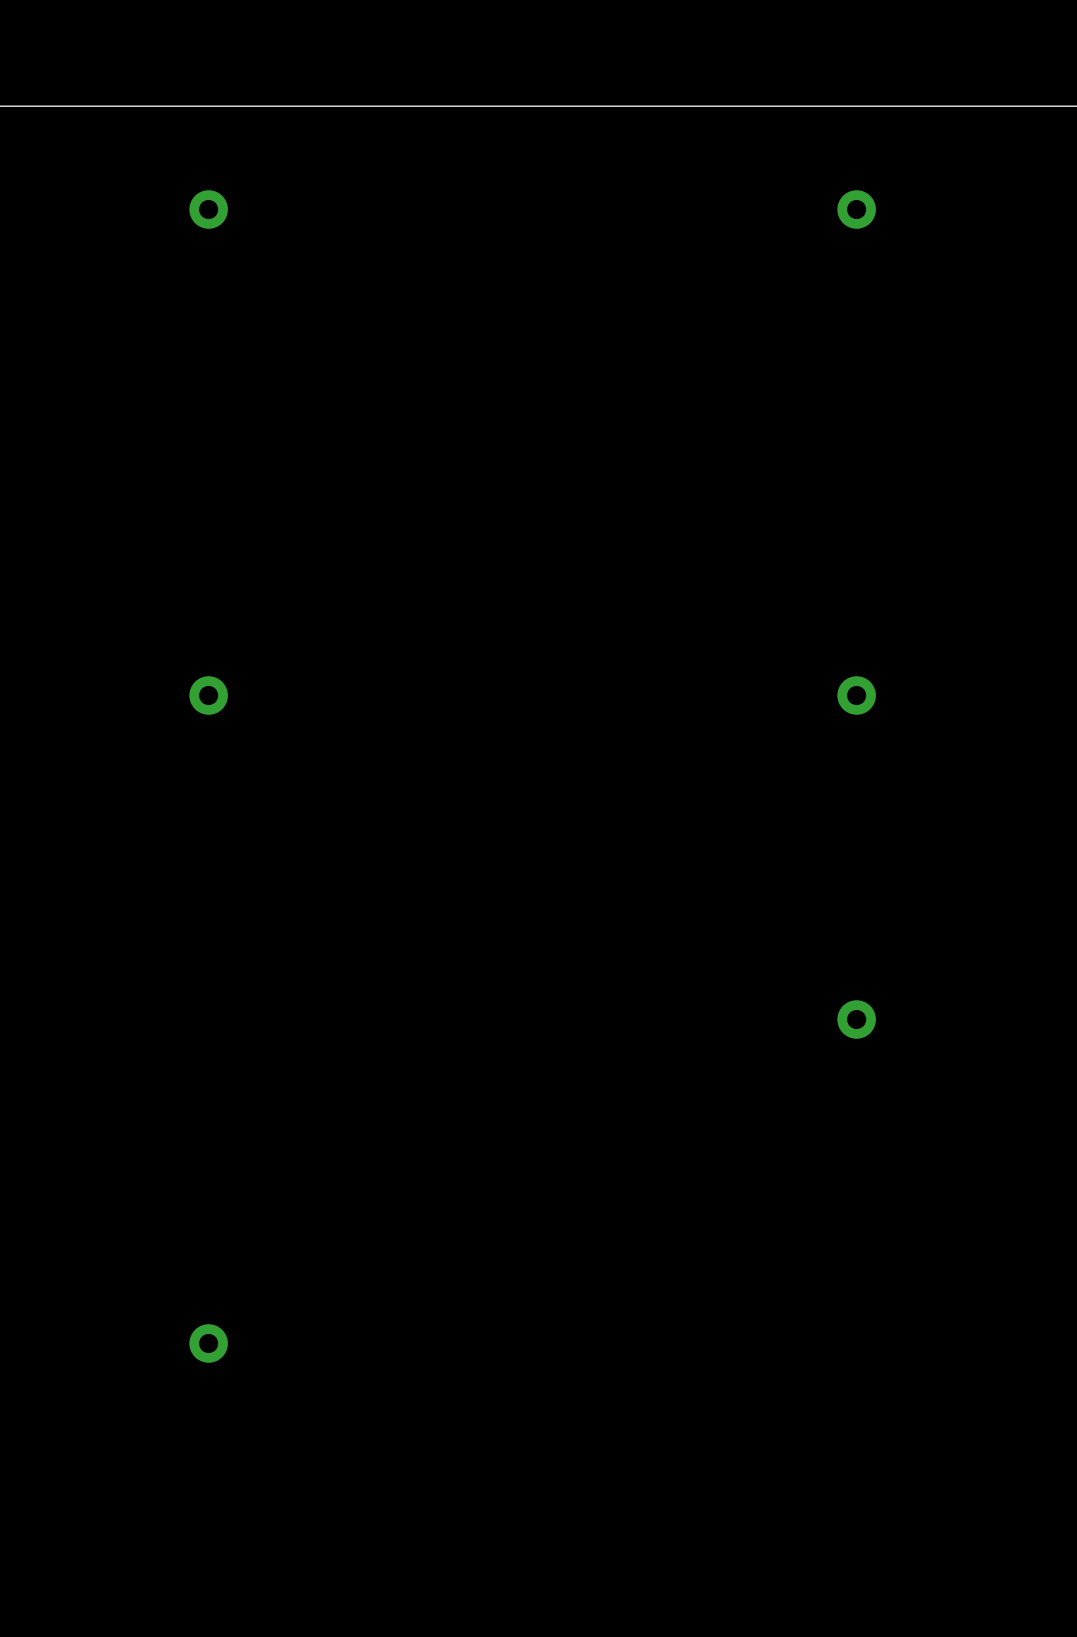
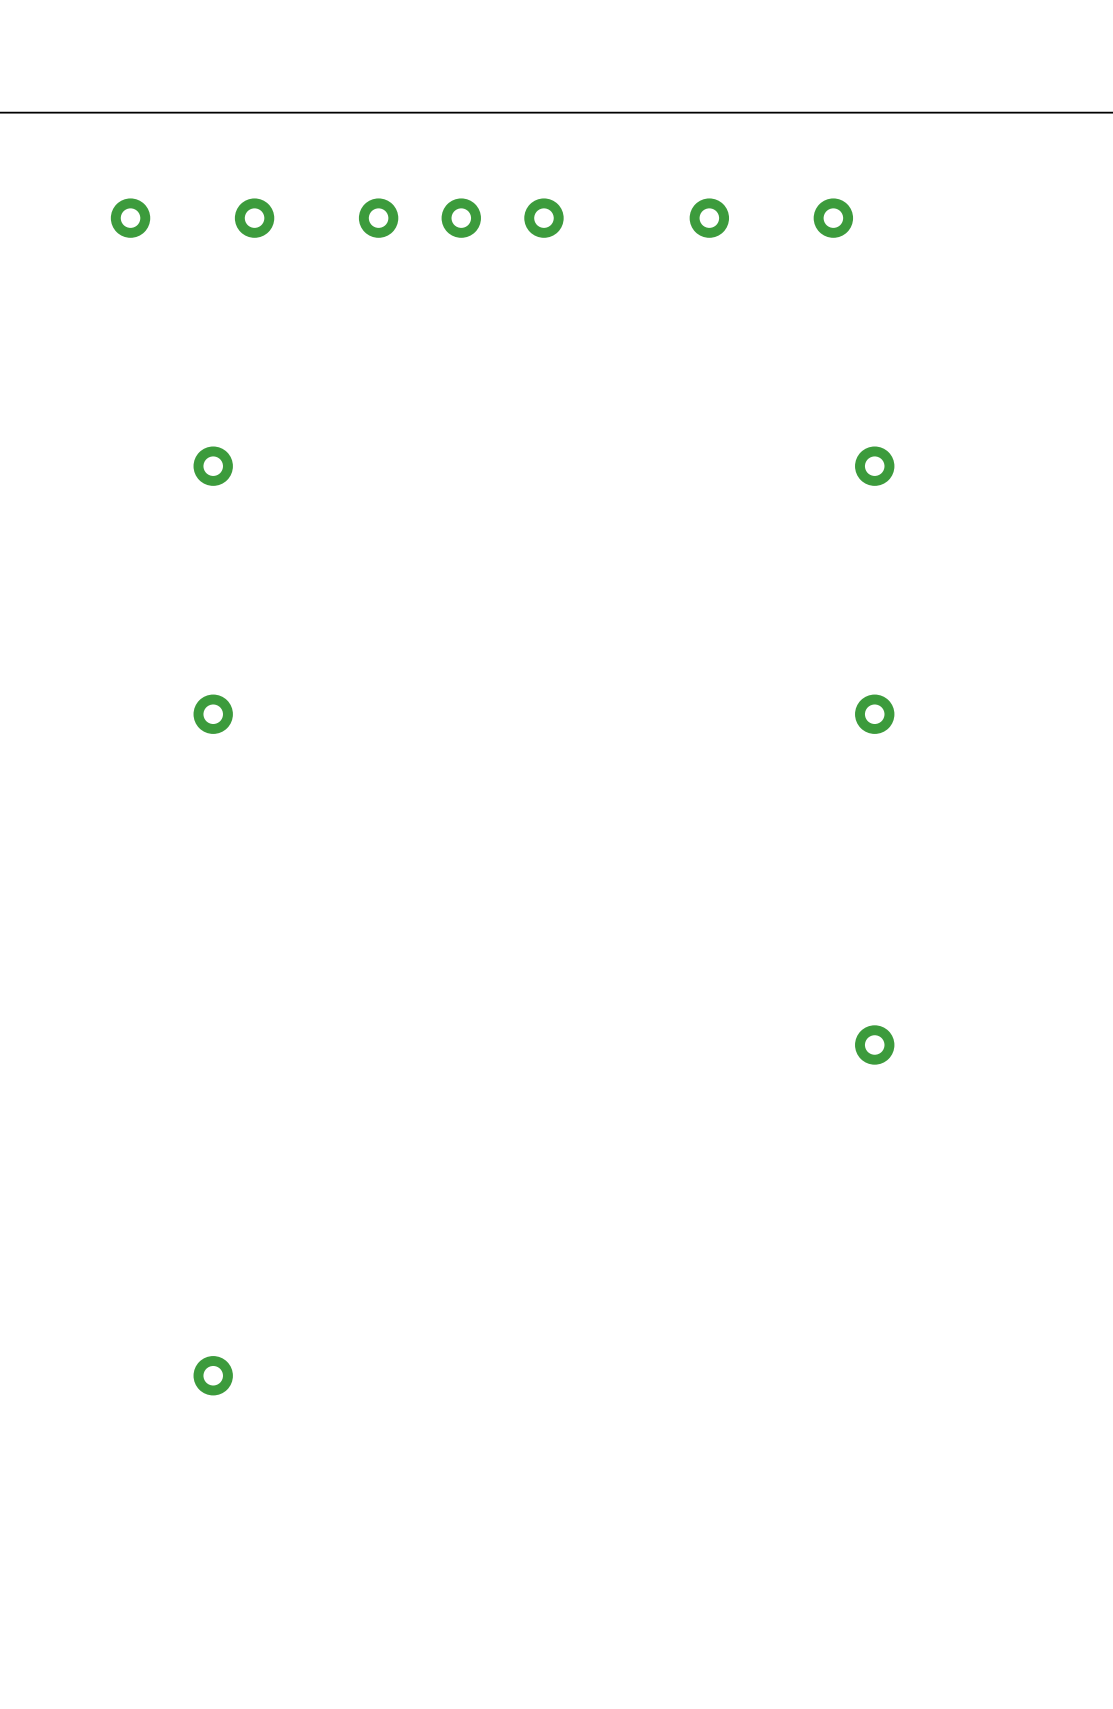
via: none -> (130, 218)
via: (208, 209) -> none
via: none -> (254, 218)
via: none -> (378, 218)
via: none -> (461, 218)
via: none -> (543, 218)
via: none -> (709, 218)
via position: (856, 209) -> (833, 218)
via: none -> (213, 466)
via: none -> (874, 466)

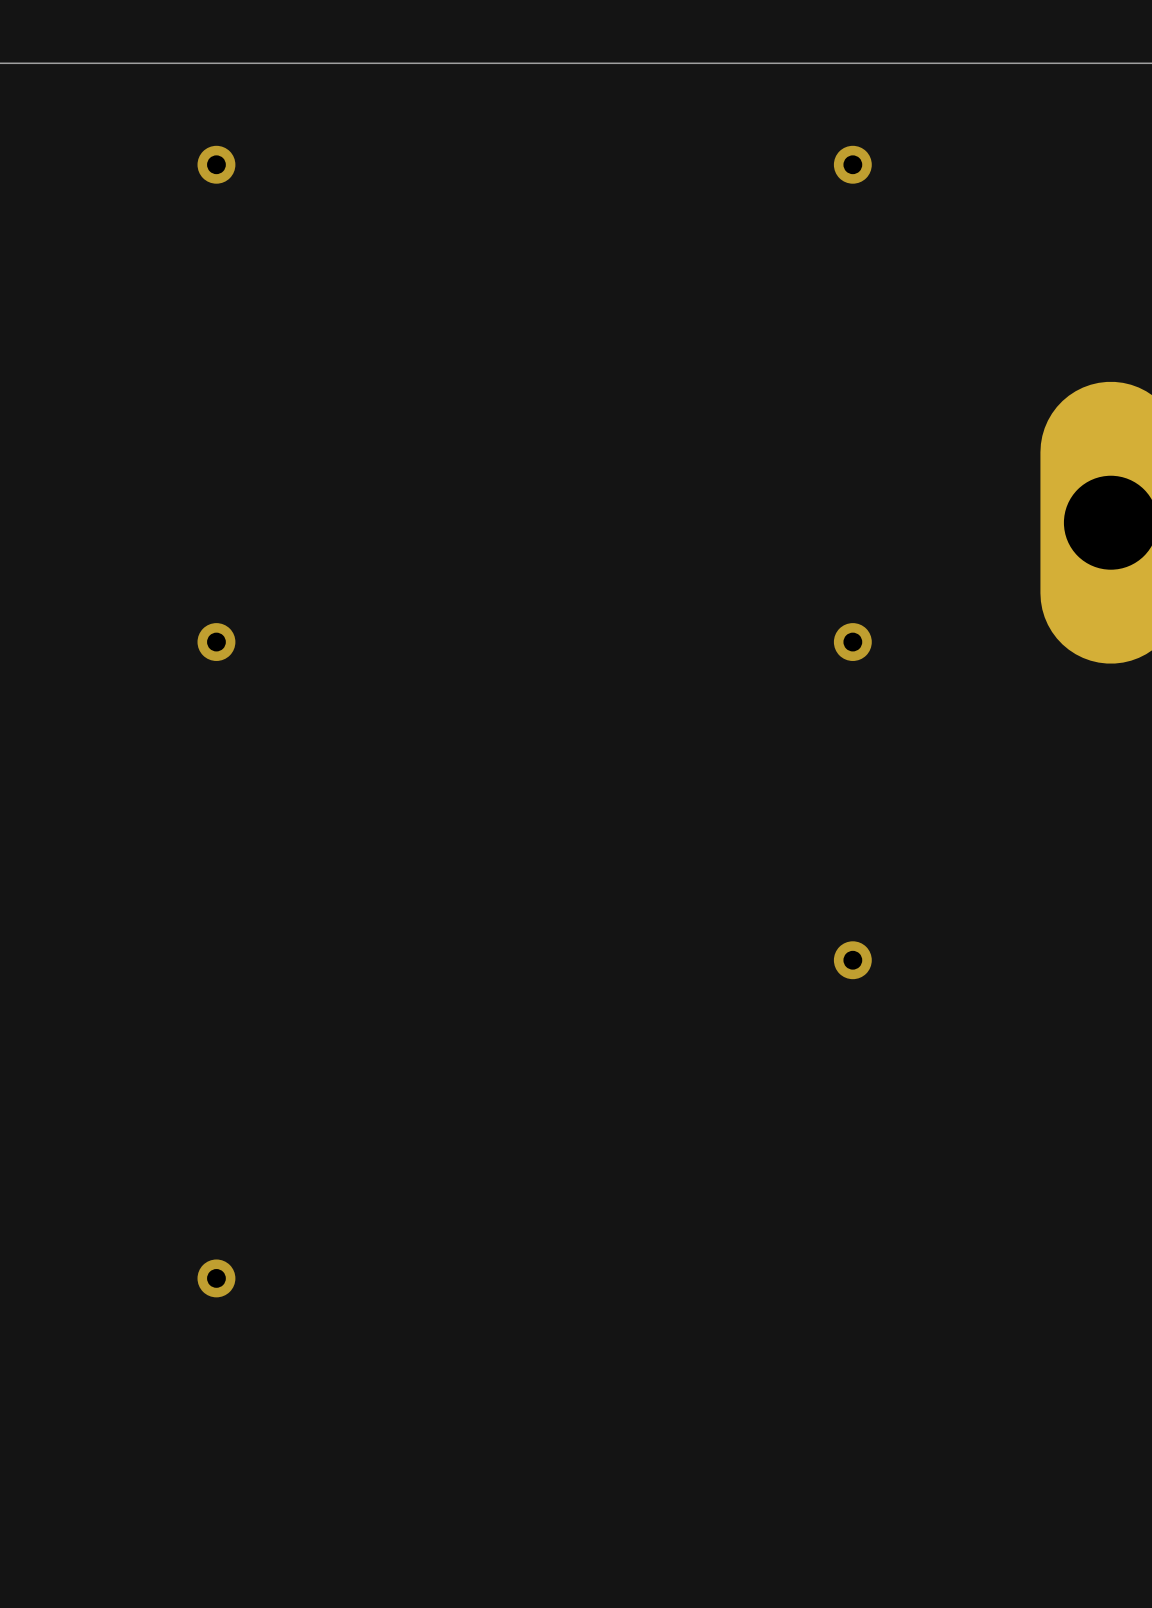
via: (130, 218) -> none
via: none -> (216, 164)
via: (254, 218) -> none
via: (378, 218) -> none
via: (461, 218) -> none
via: (543, 218) -> none
via: (709, 218) -> none
via position: (833, 218) -> (852, 164)
via: (213, 466) -> none
via: (874, 466) -> none

